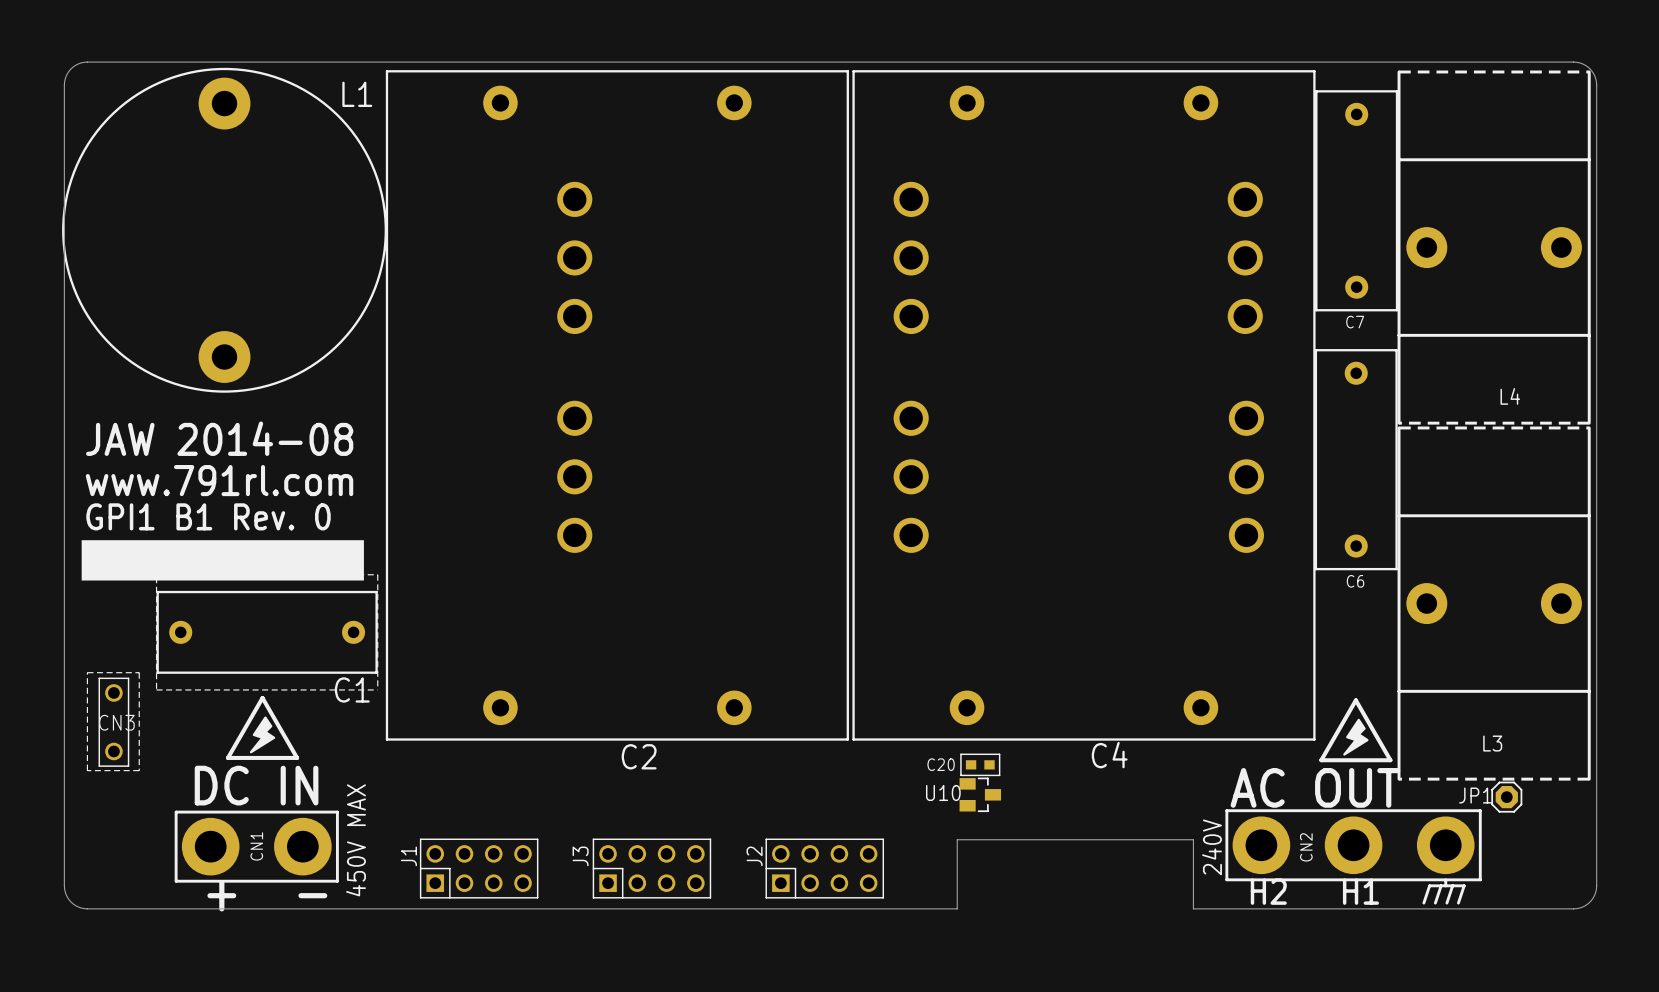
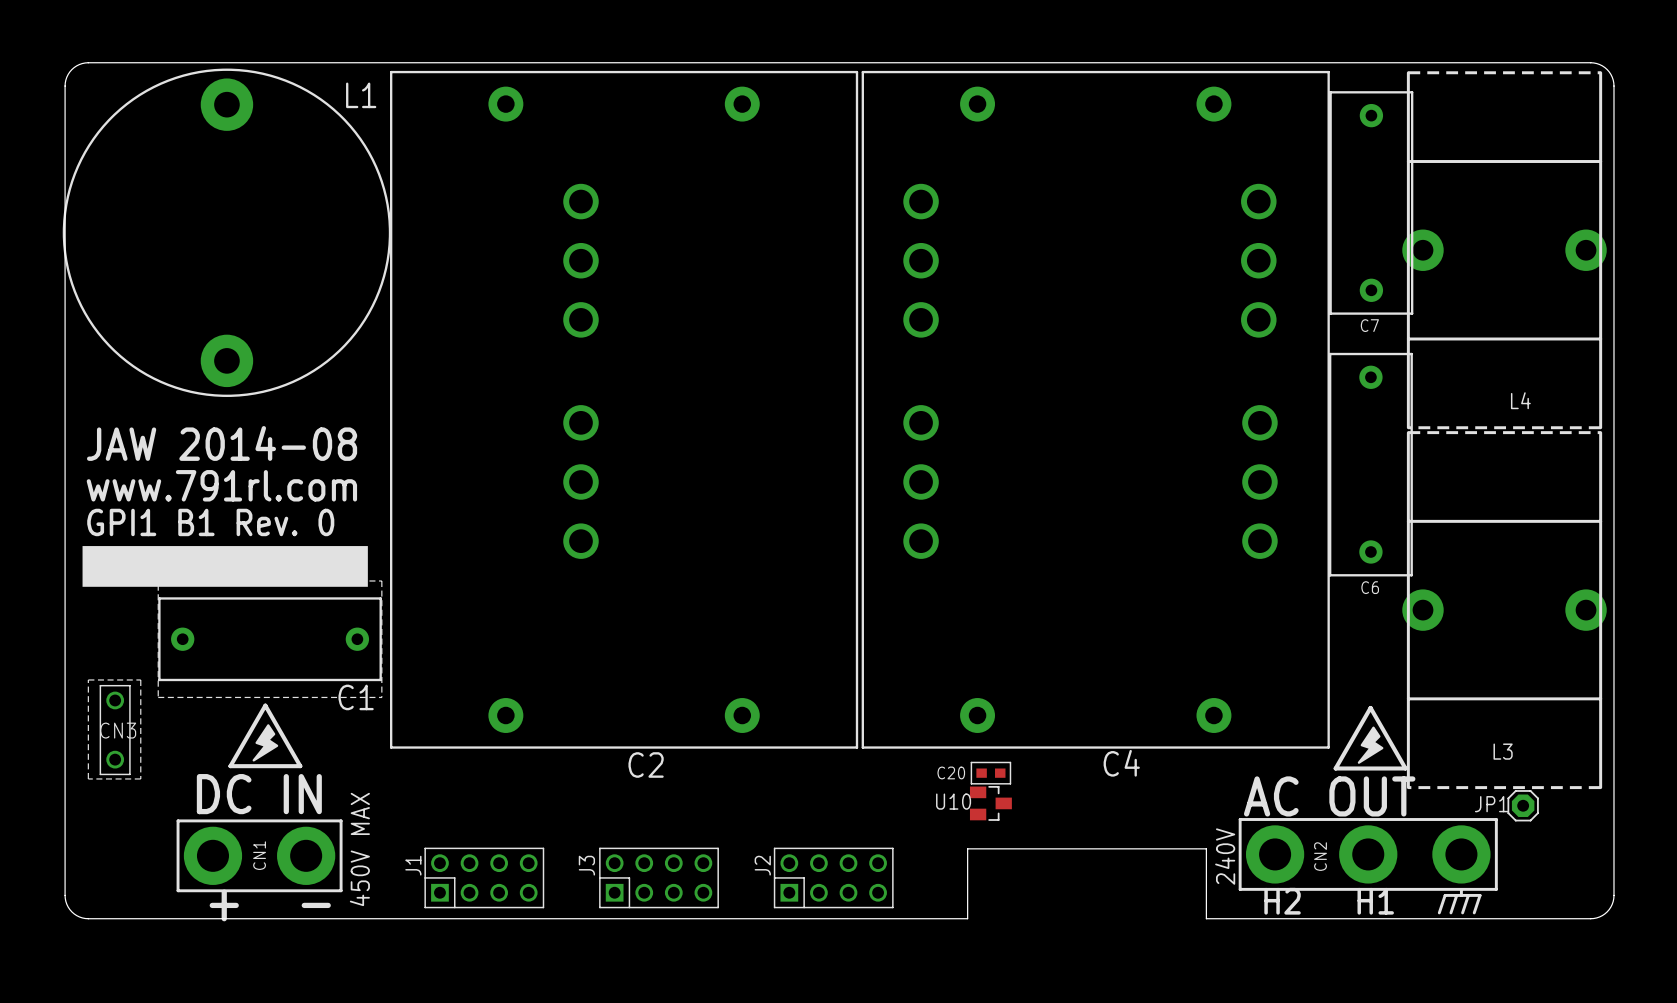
L4 footprint: [1397, 70, 1591, 425] -> [1402, 71, 1607, 430]
L3 footprint: [1397, 426, 1591, 781] -> [1402, 431, 1607, 790]

